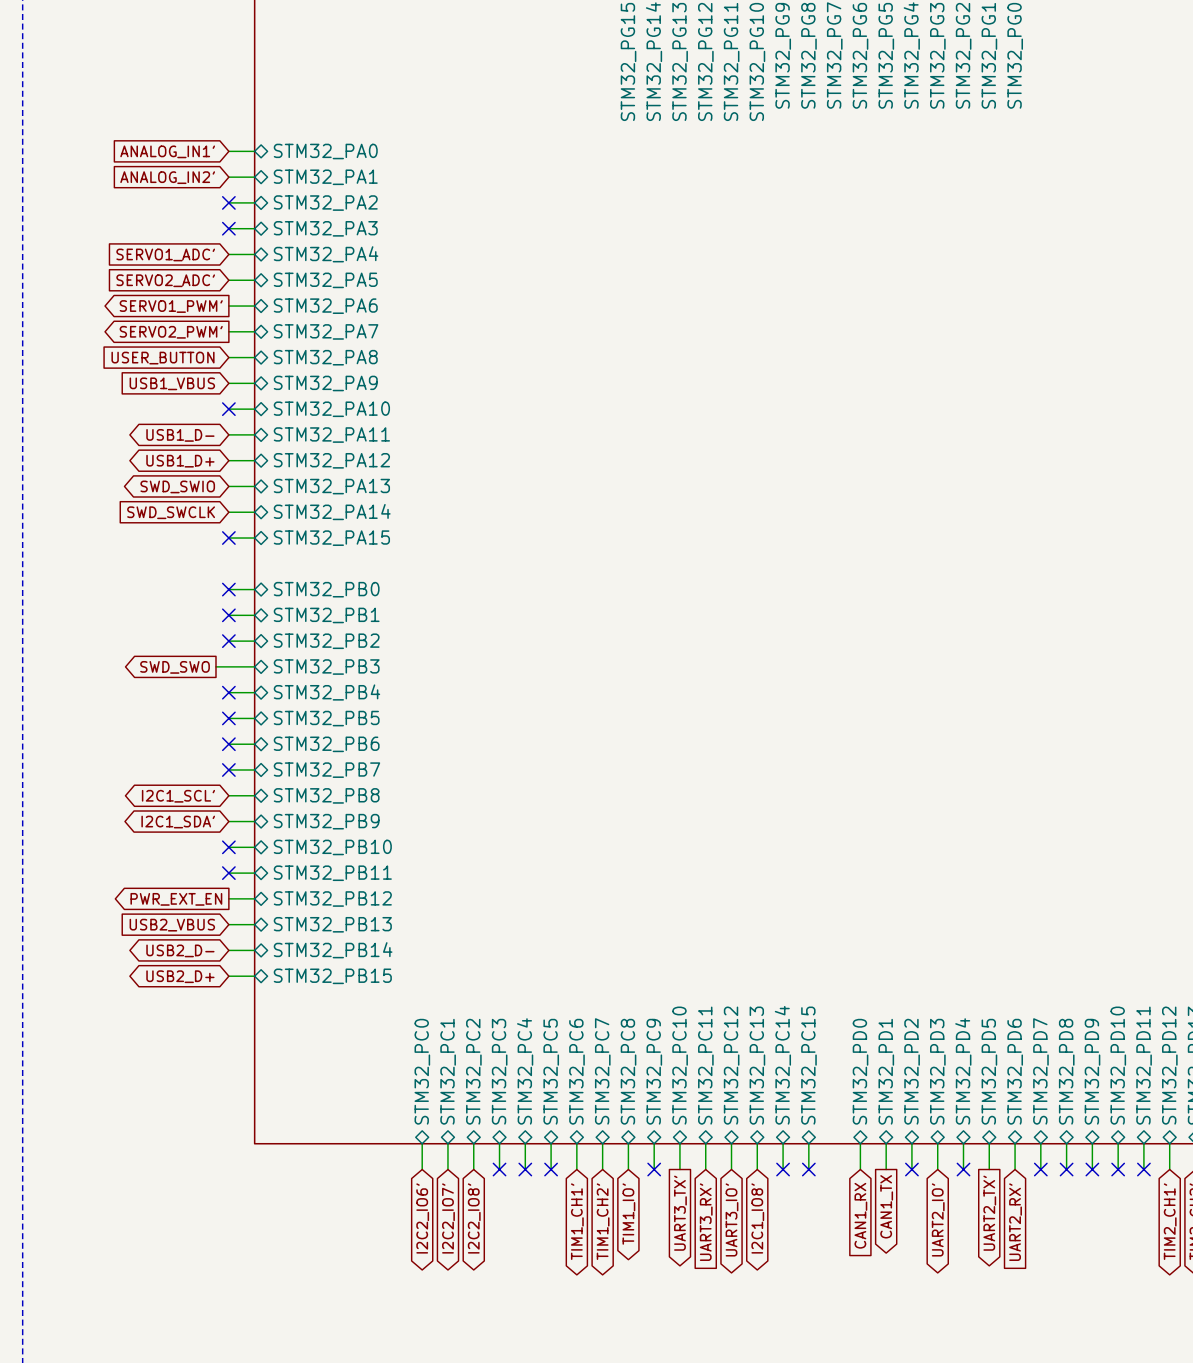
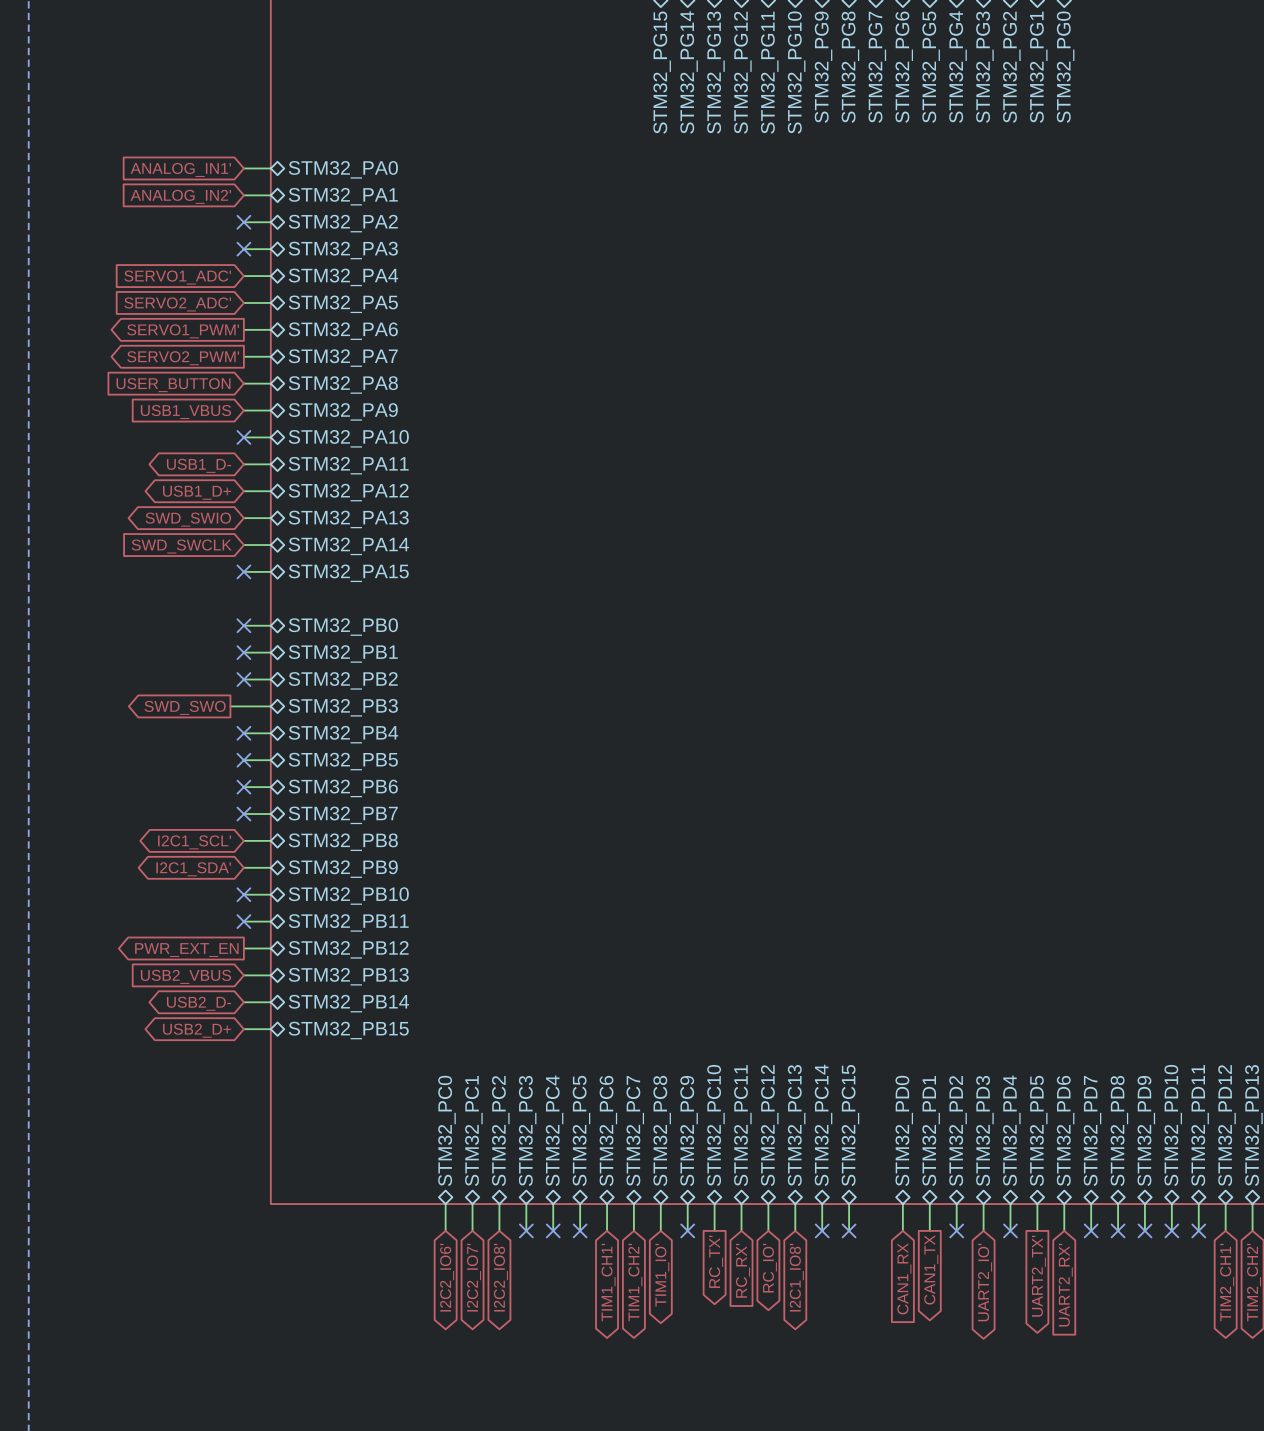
global label: UART3_TX' (680, 1213) -> RC_TX' (716, 1261)
global label: UART3_IO' (732, 1219) -> RC_IO' (769, 1268)
global label: UART3_RX' (706, 1222) -> RC_RX' (742, 1270)

